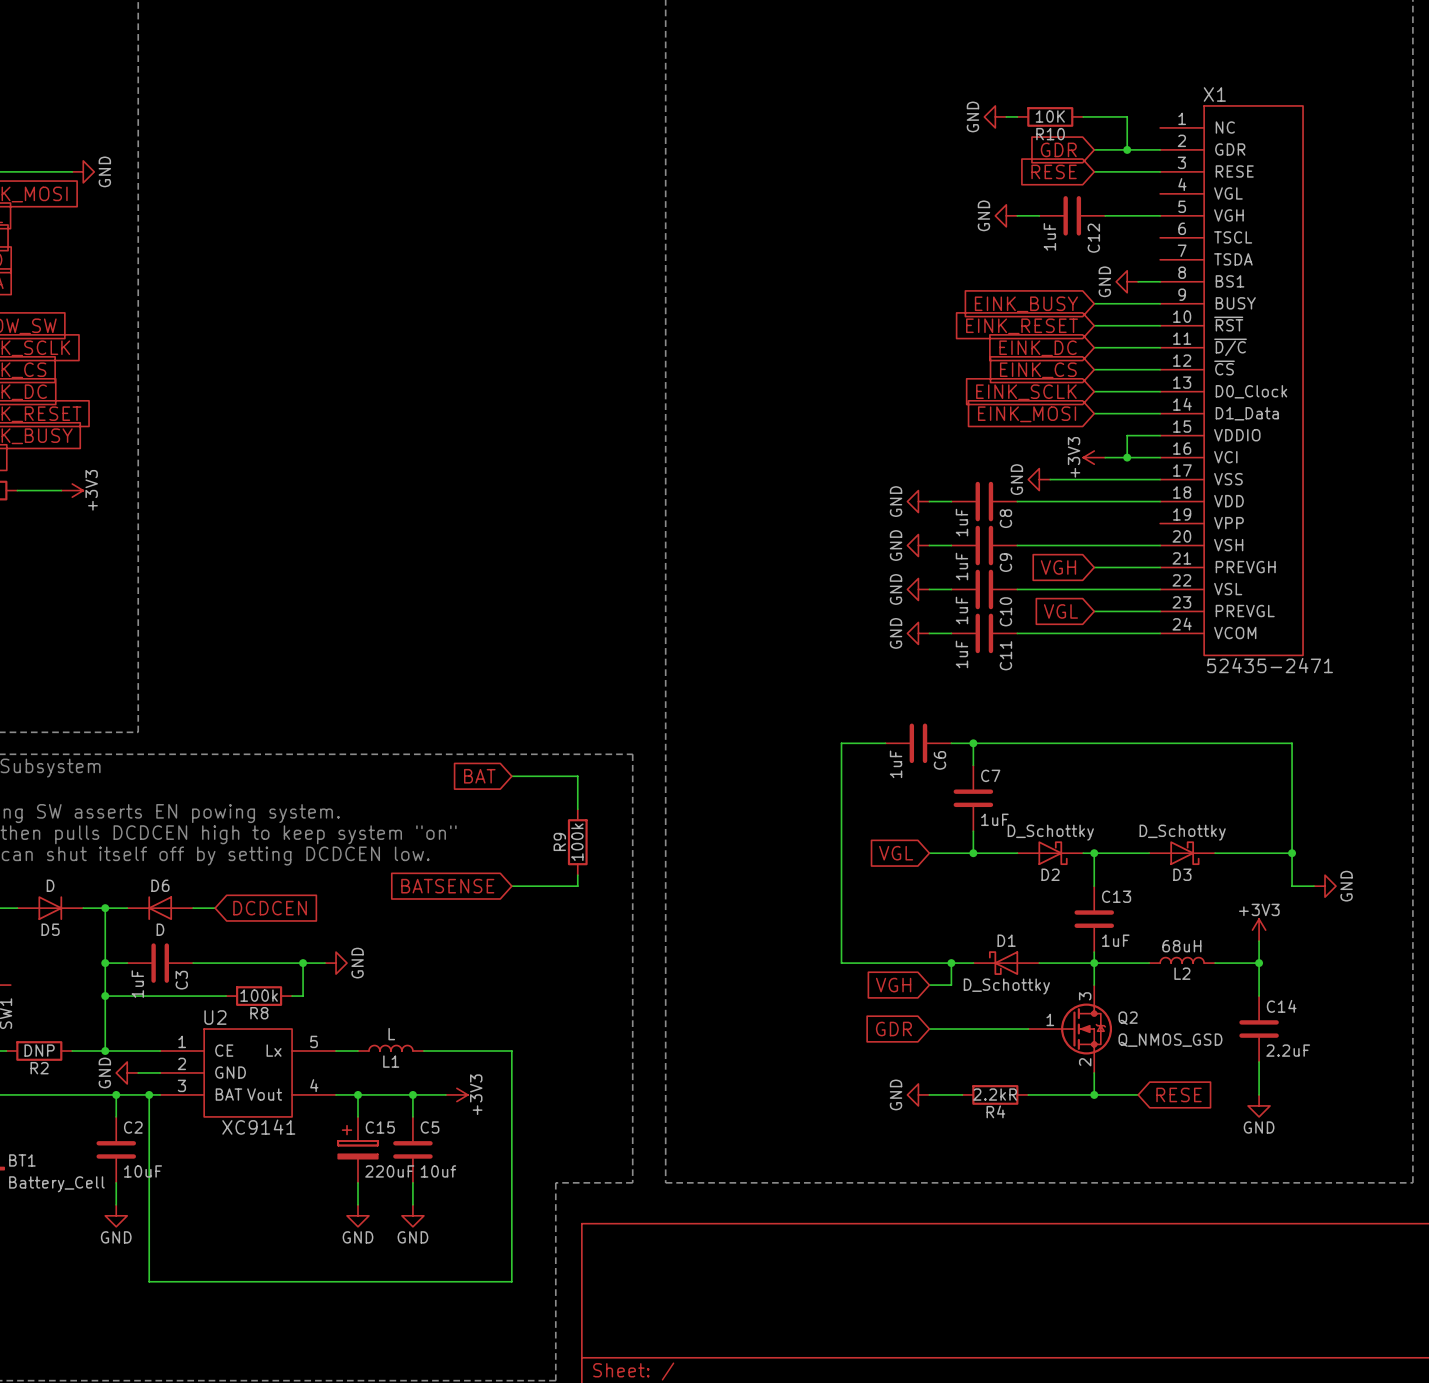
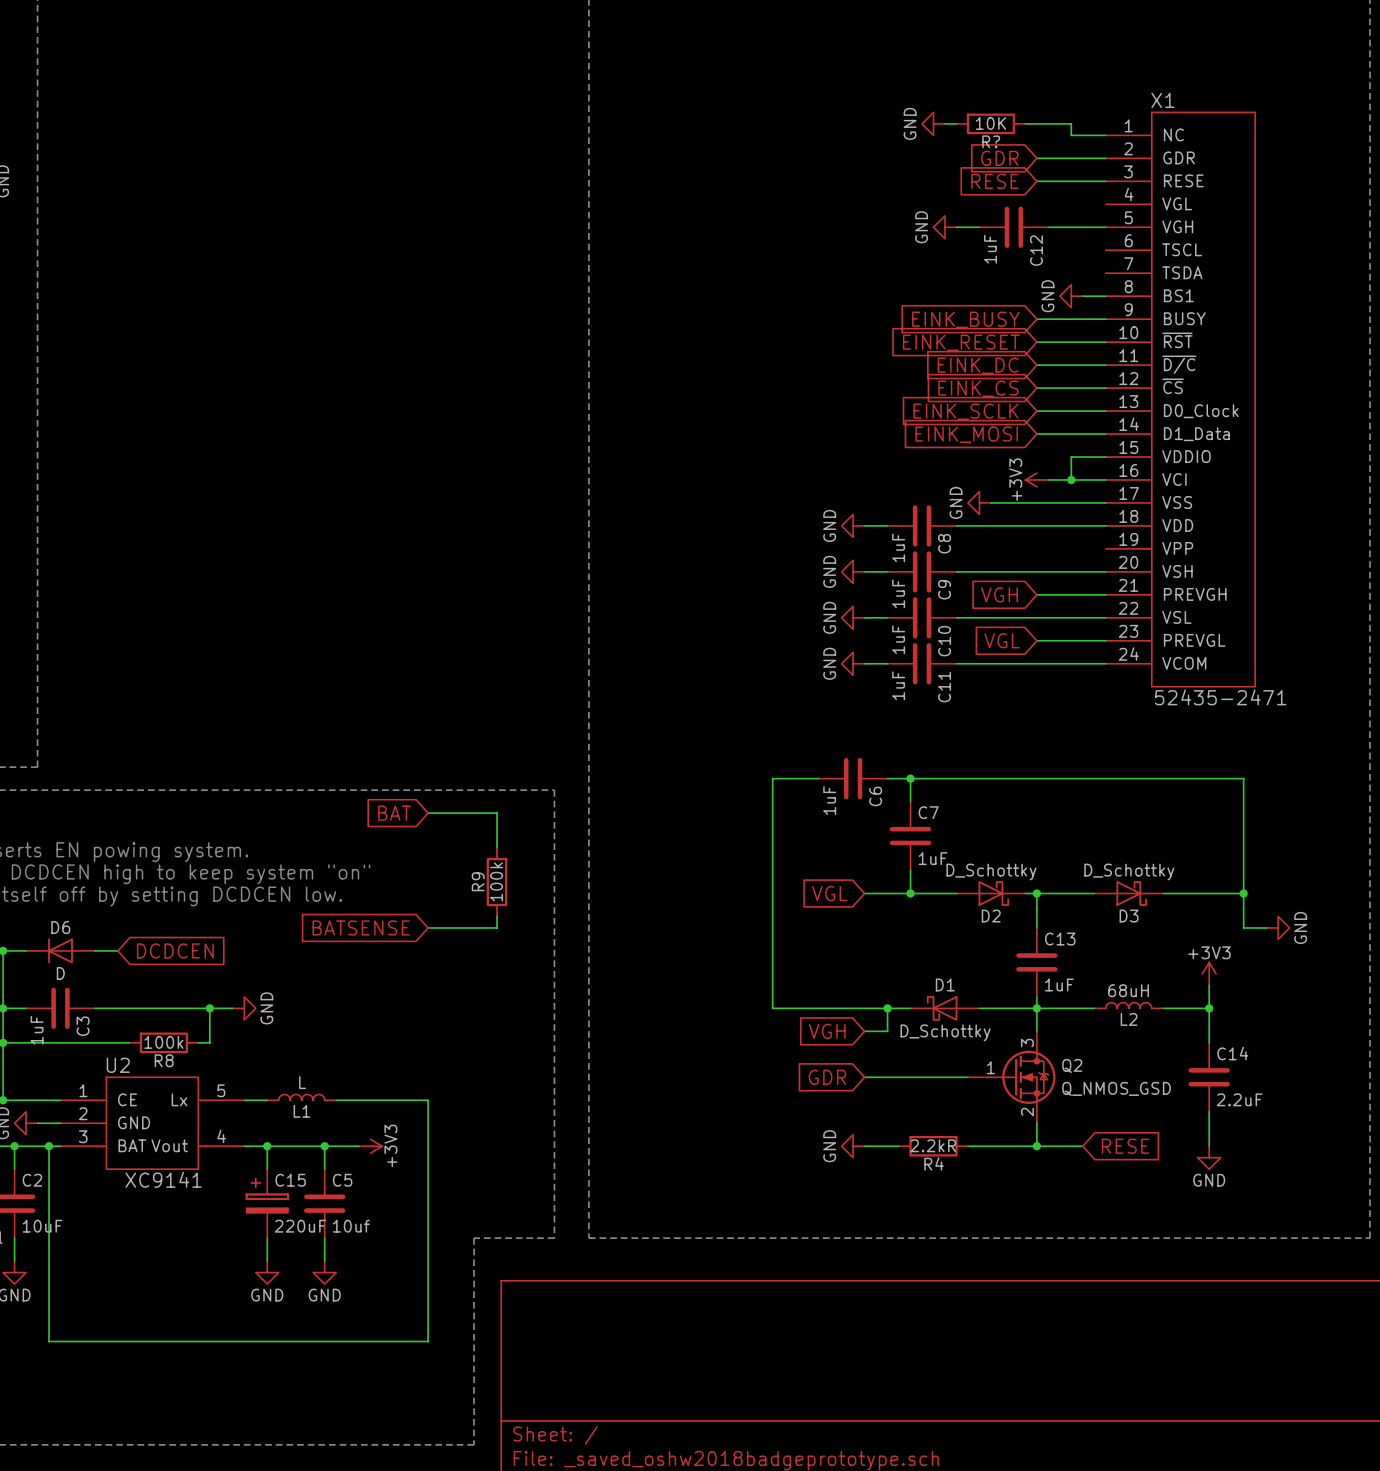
wire: (1127, 127) (1127, 149) -> (1071, 135) (1105, 135)
R10 name: R10 (1050, 134) -> R? (991, 141)
junction: (1127, 149) -> none

